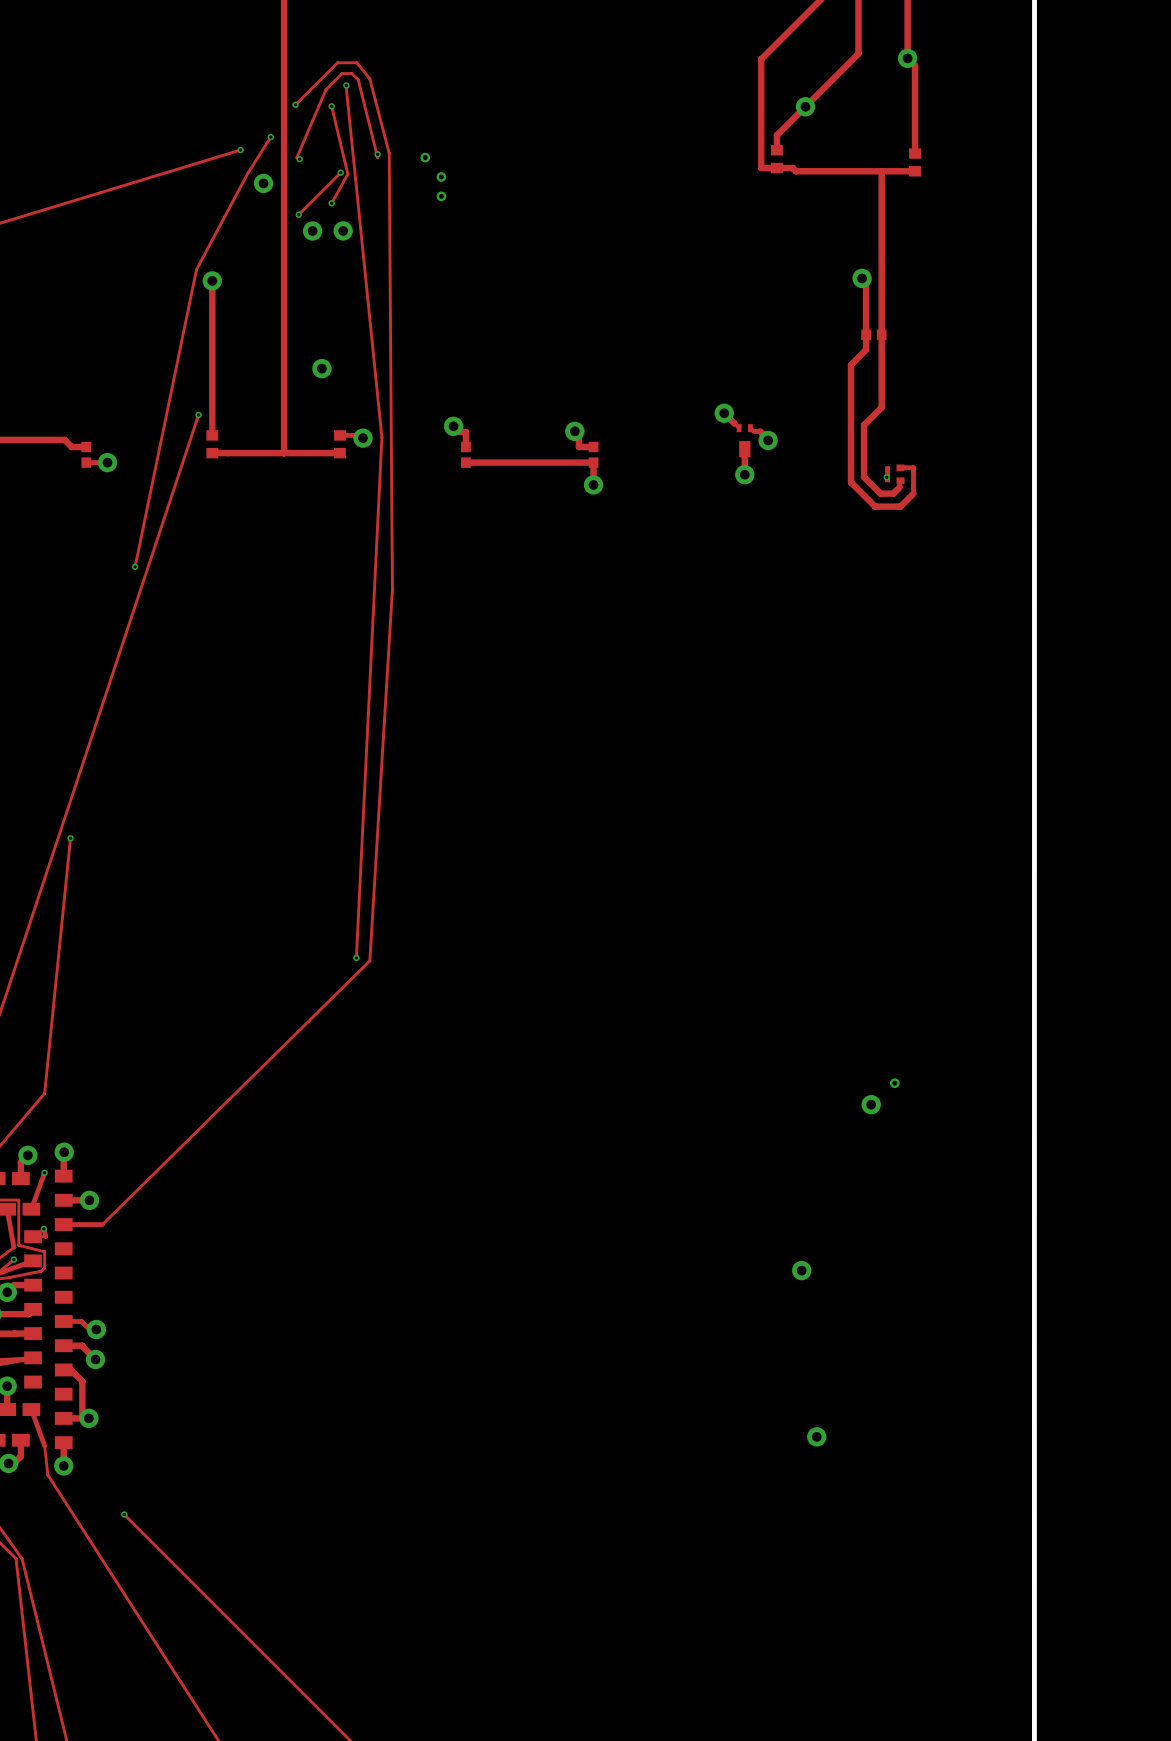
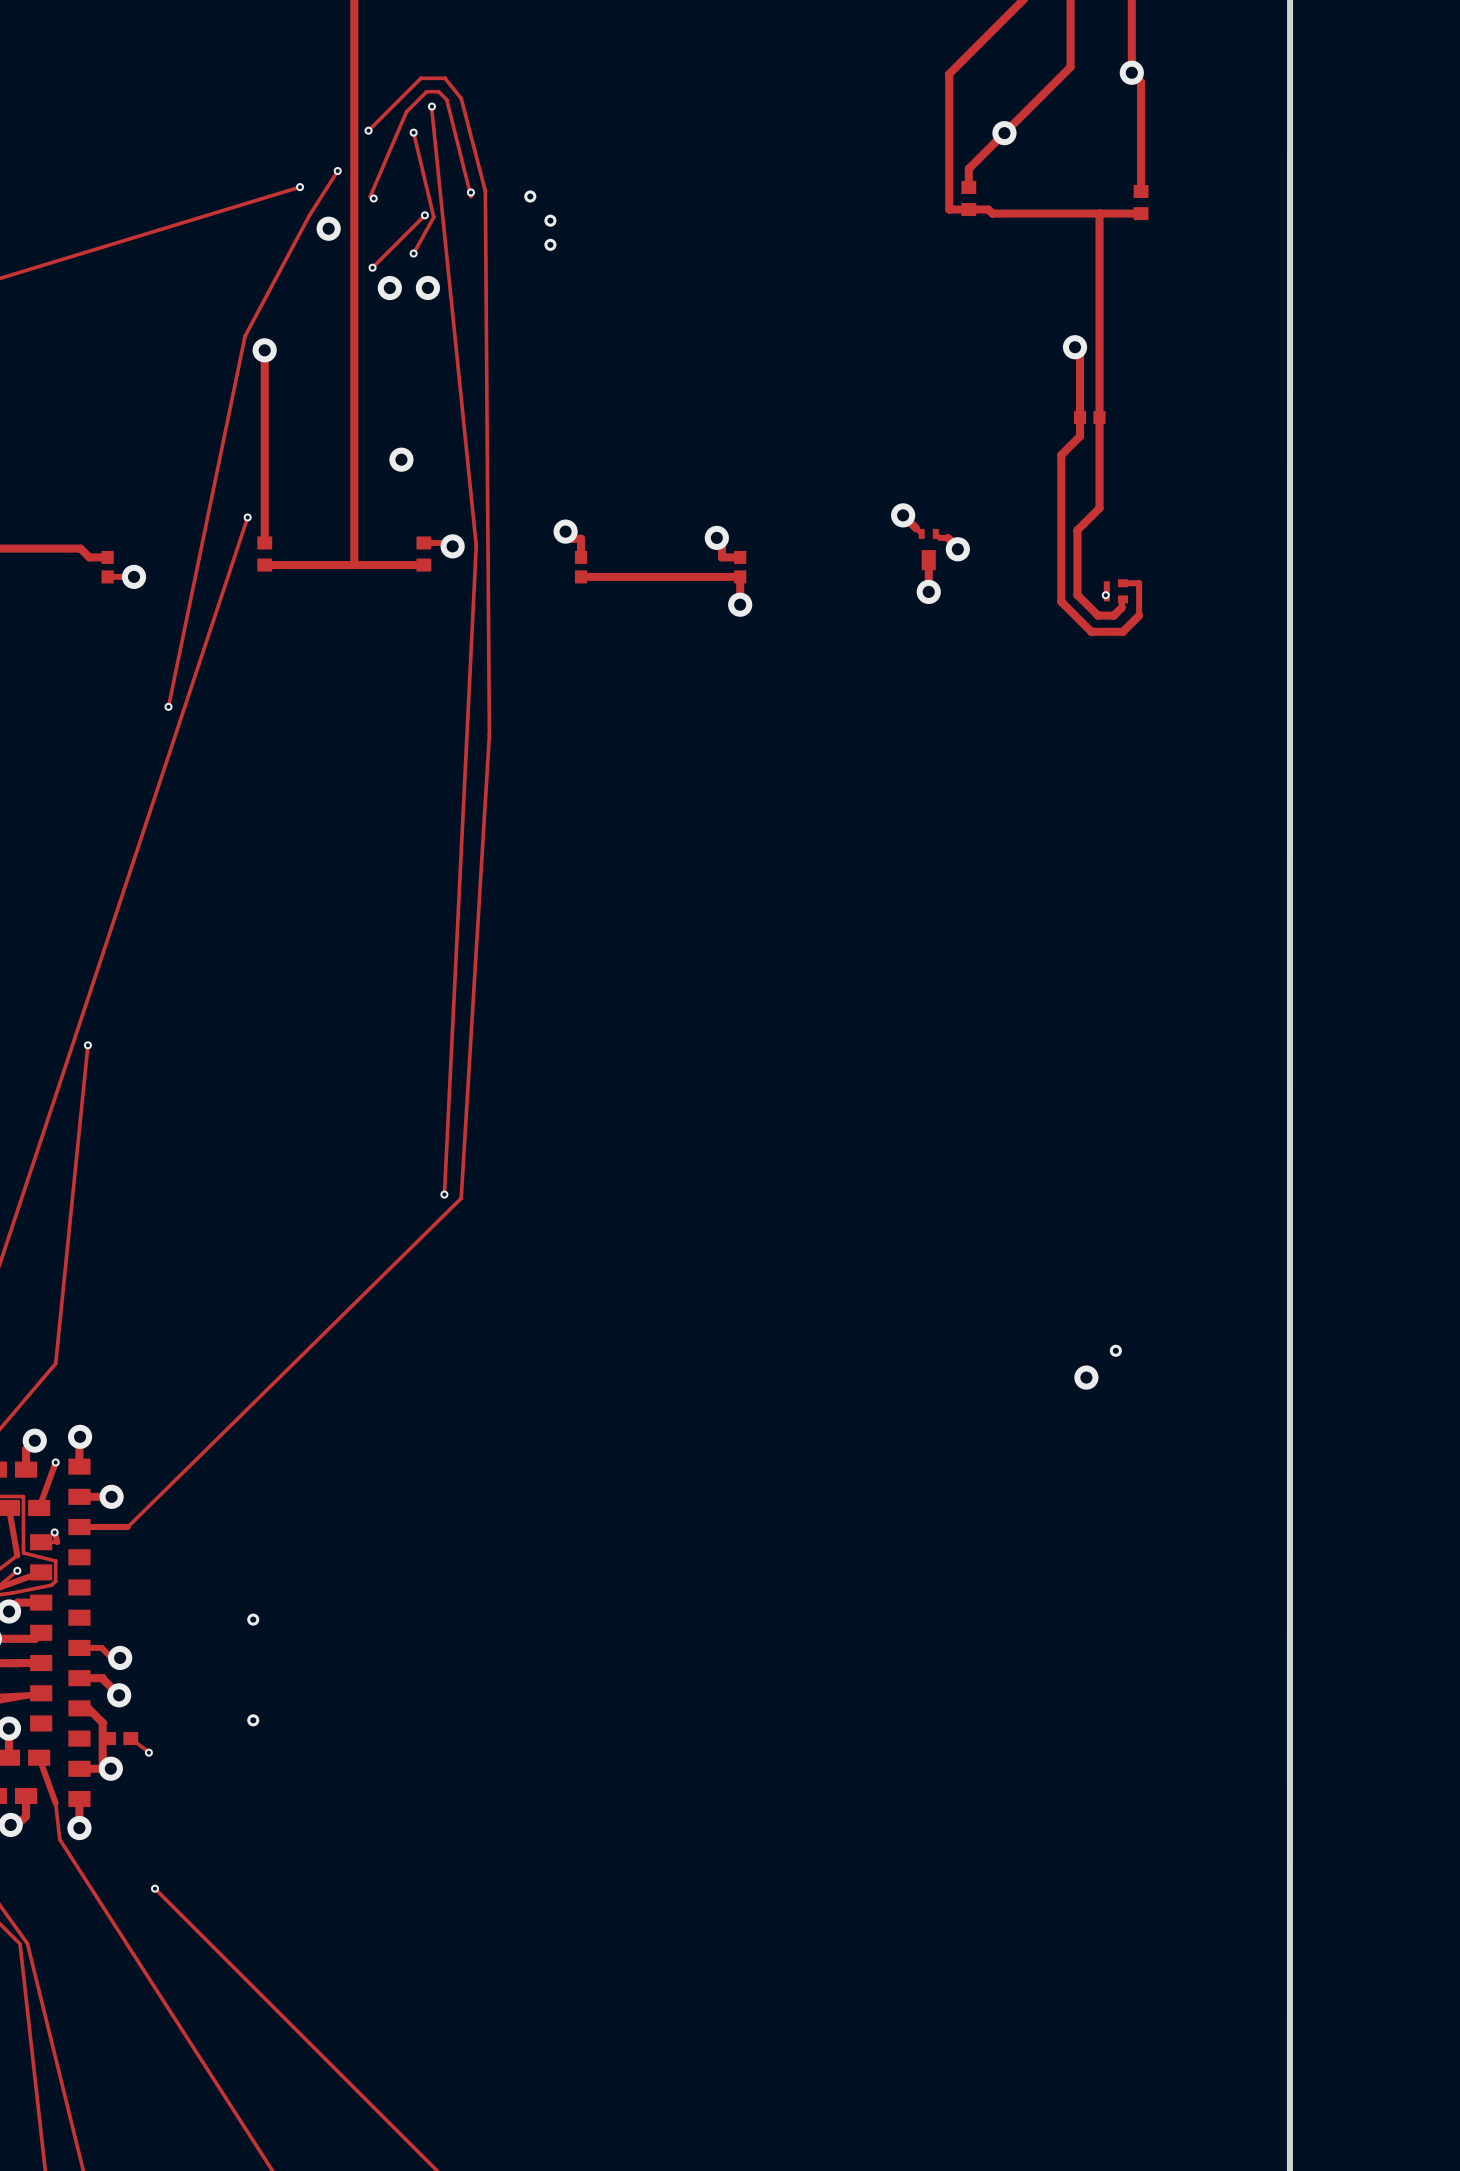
via: (801, 1270) -> none
via: none -> (253, 1619)
via: none -> (253, 1720)
part: none -> (119, 1738)
track: none -> (130, 1738) (146, 1750)
via: none -> (148, 1752)
via: (816, 1436) -> none

